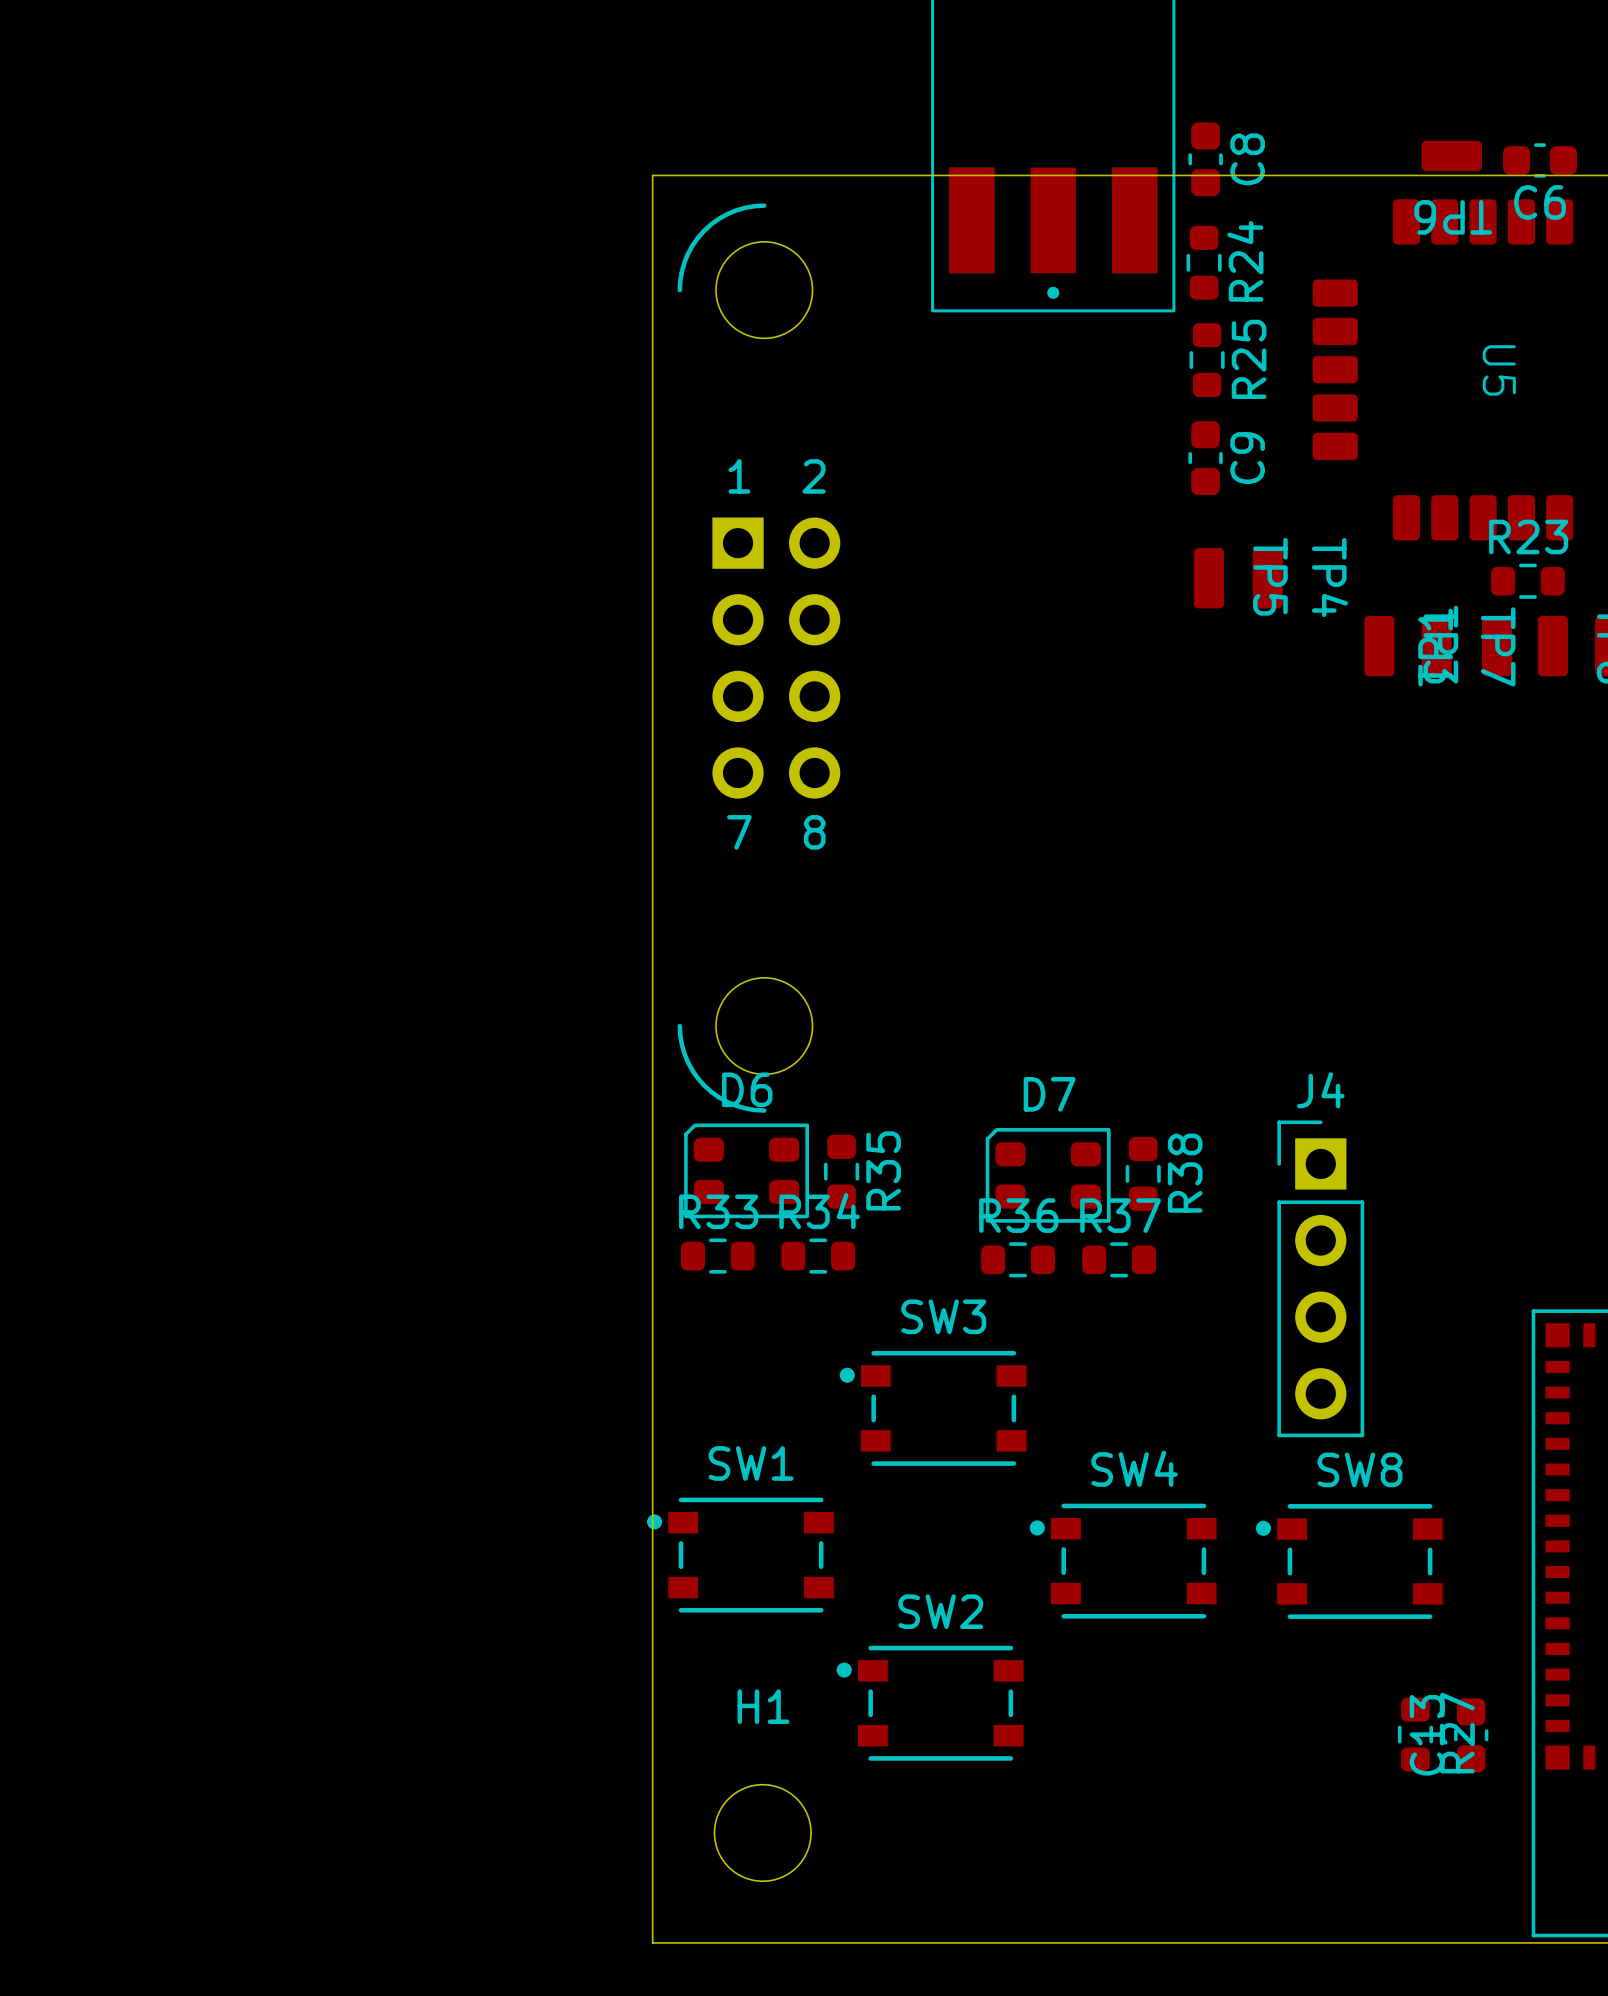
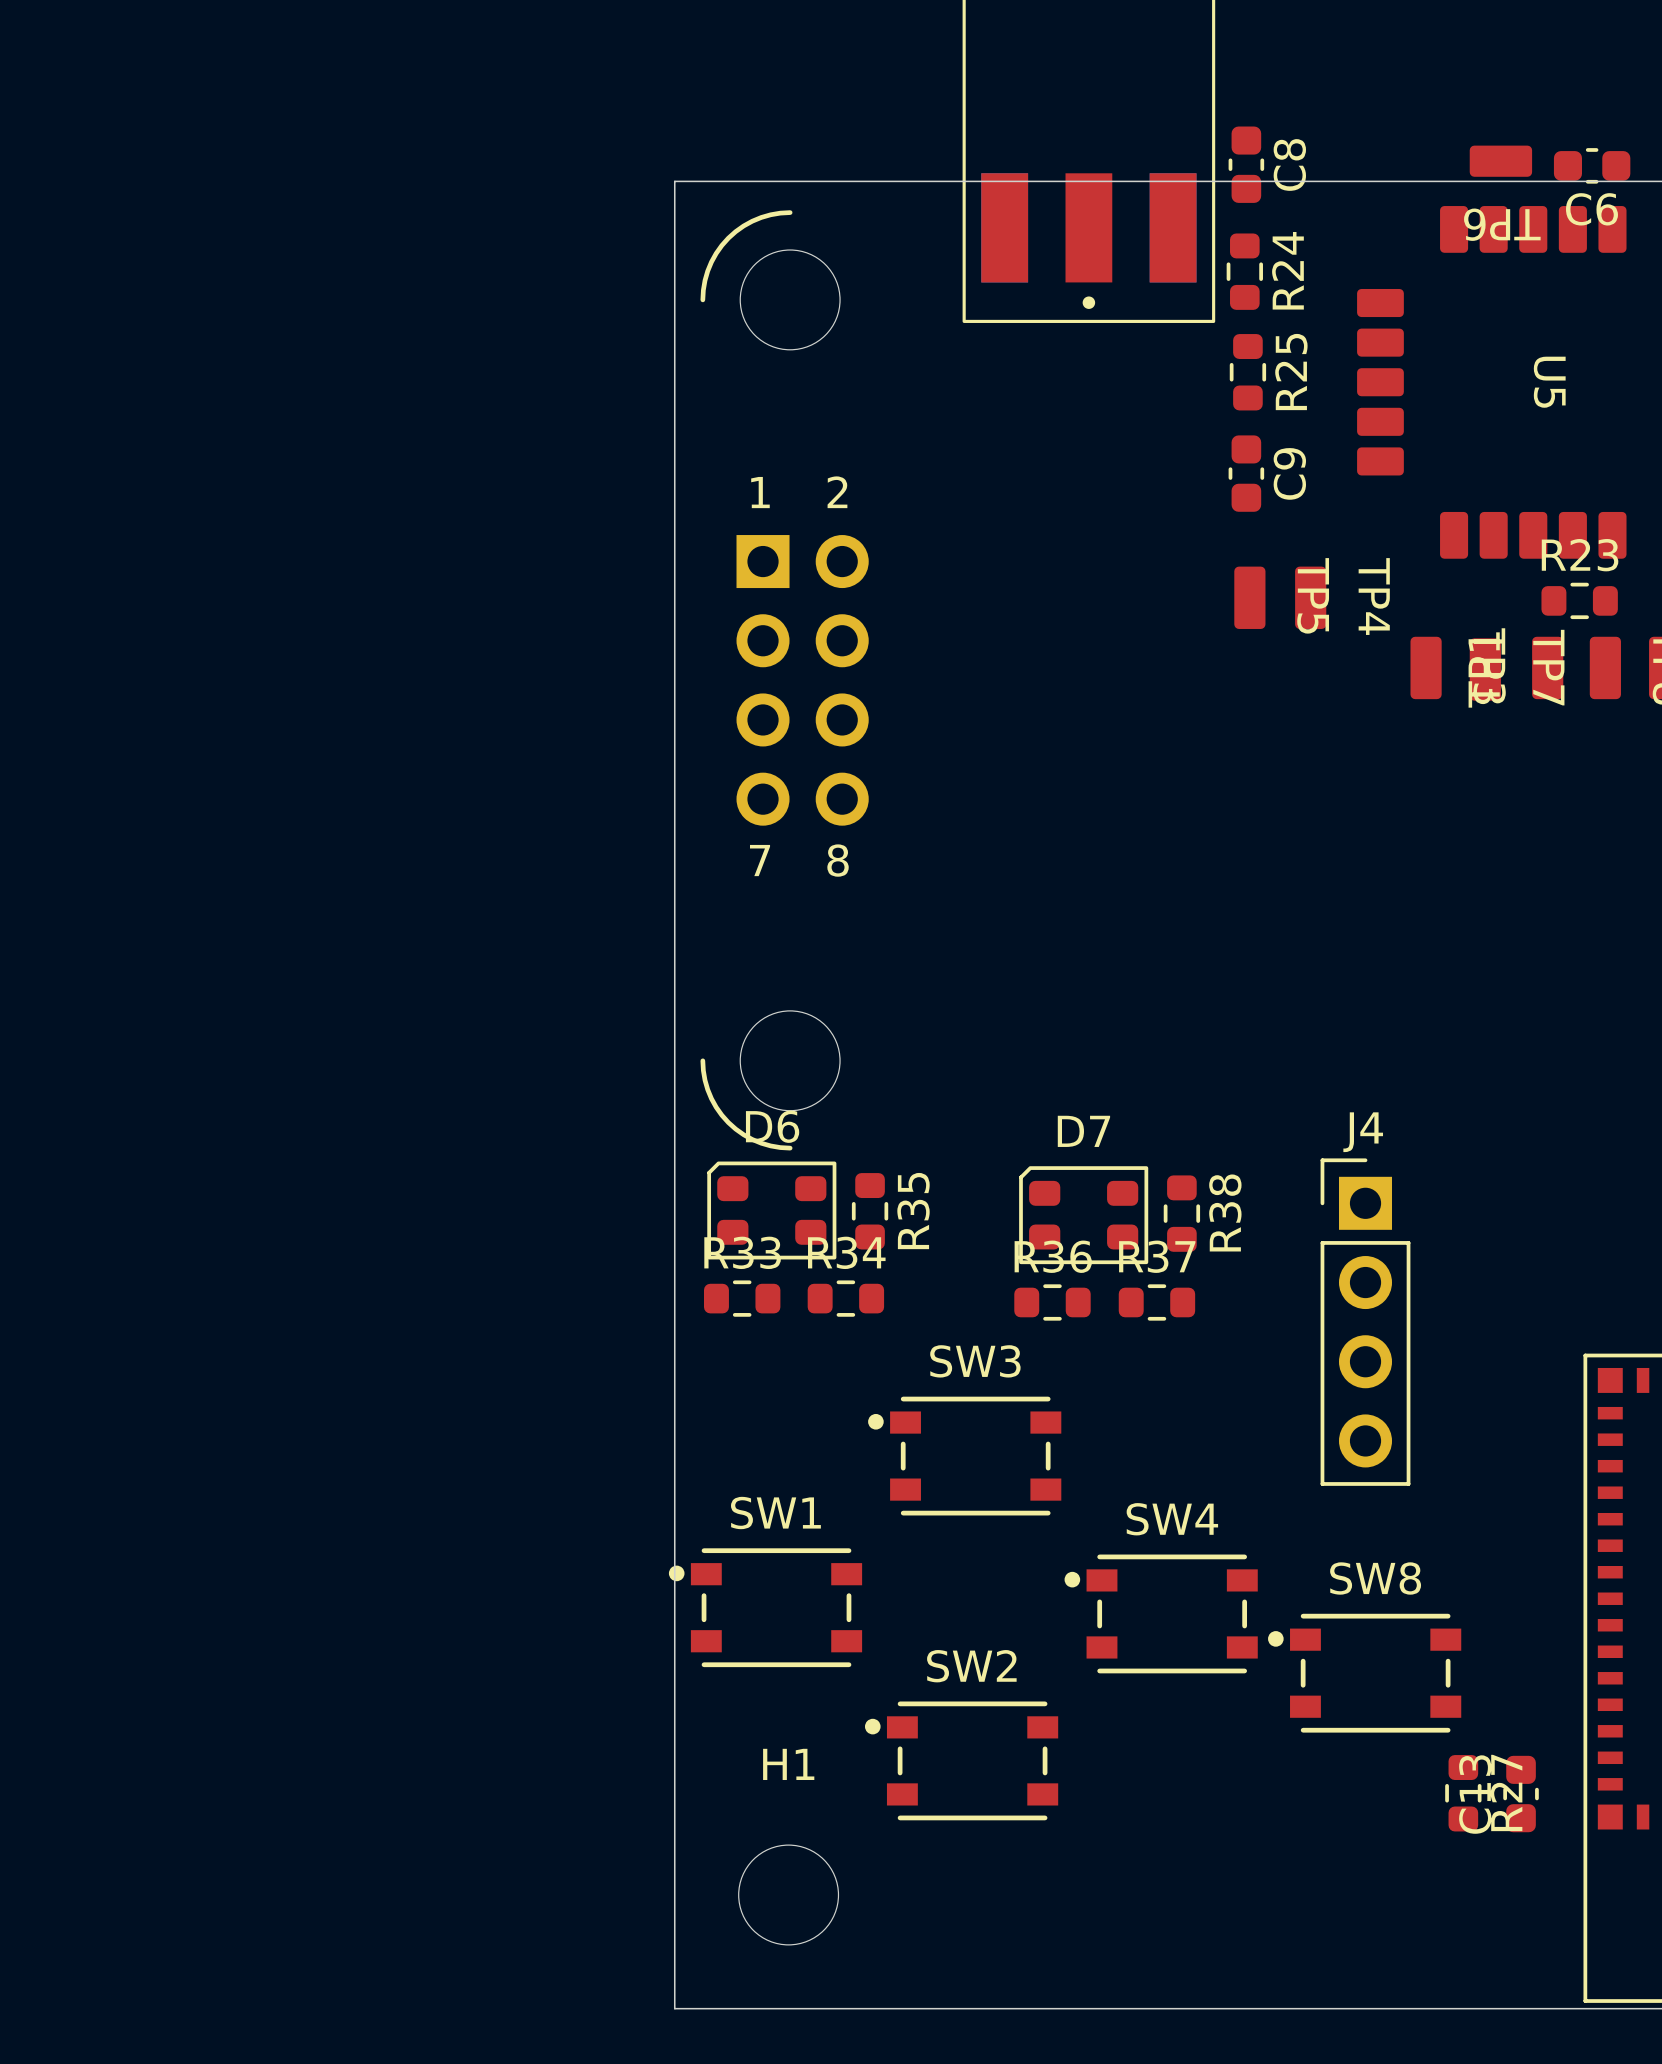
SW8 position: (1349, 1561) -> (1364, 1673)

